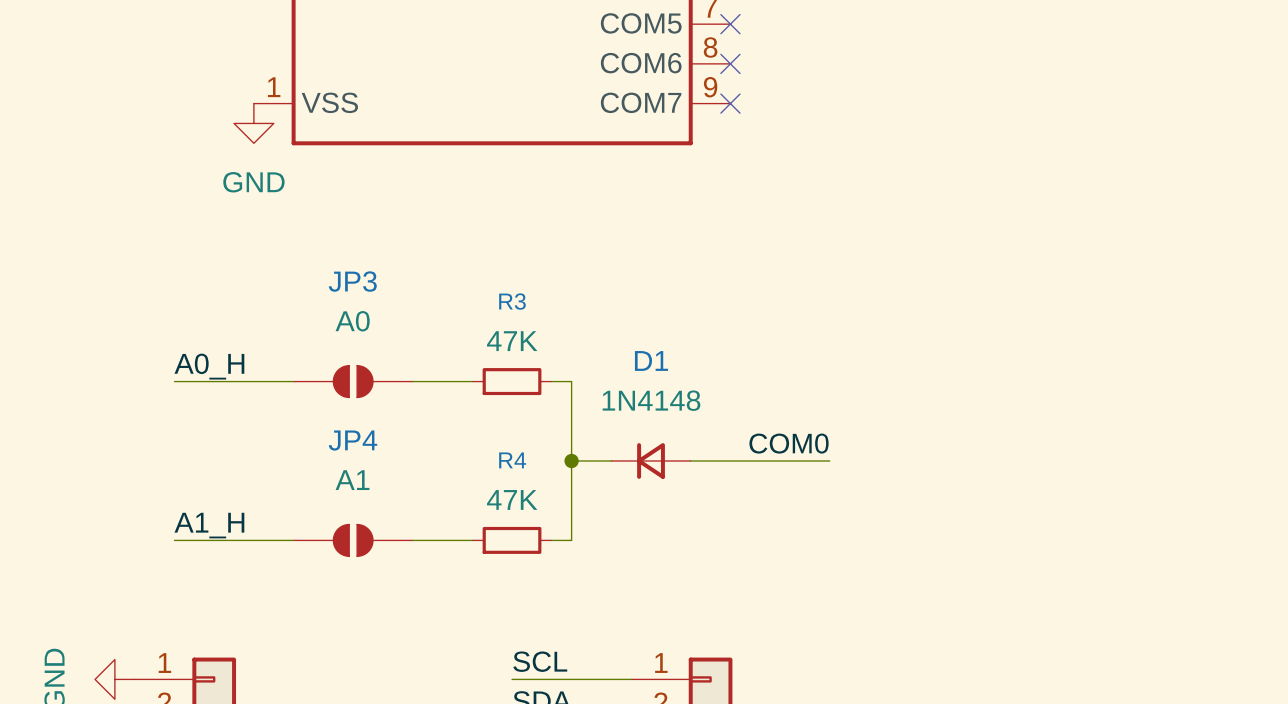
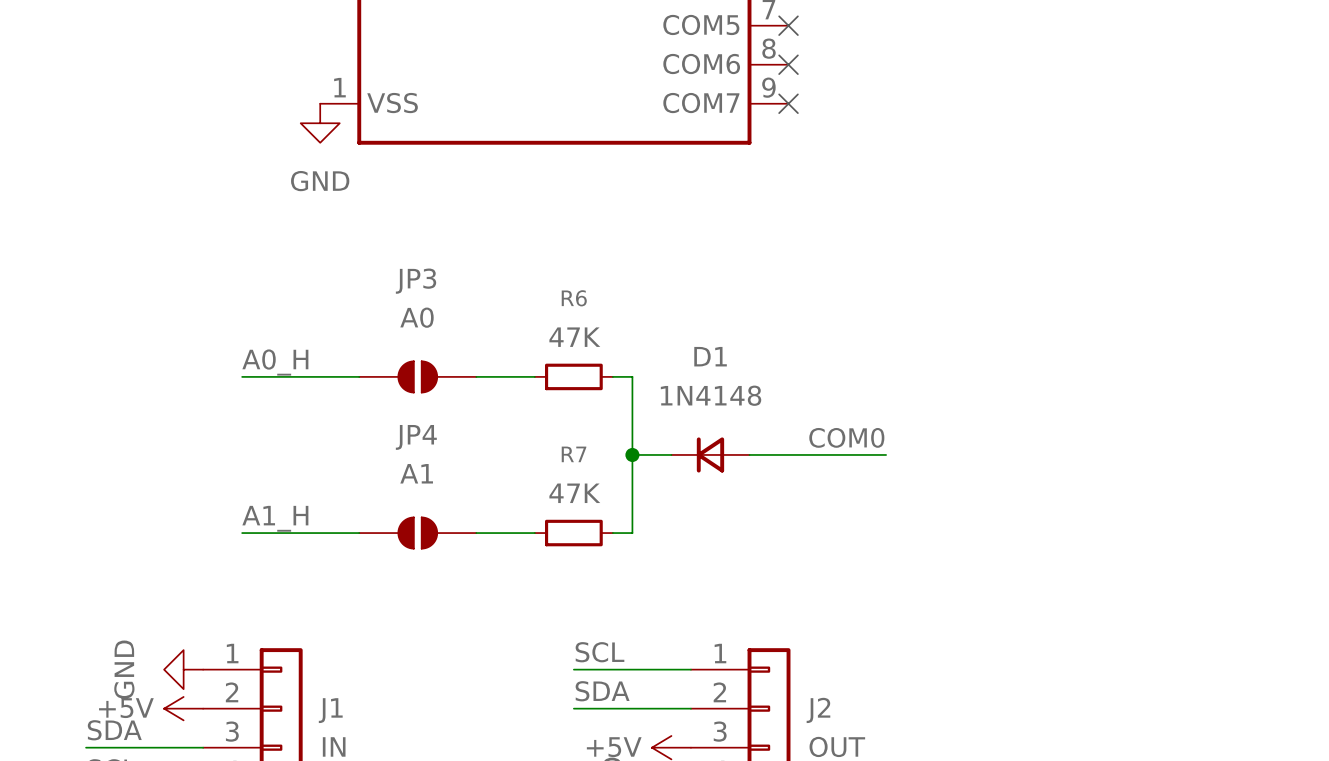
R3 name: R3 (512, 301) -> R6 (574, 298)
R4 name: R4 (512, 460) -> R7 (574, 454)

